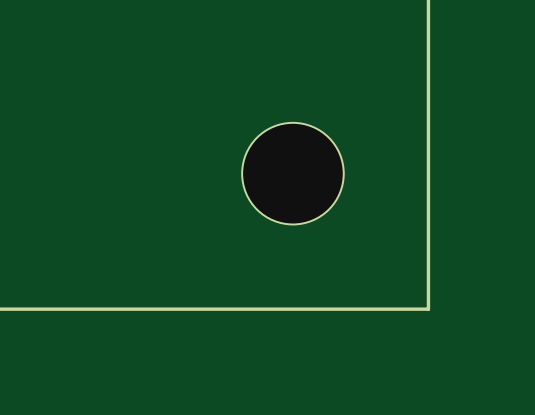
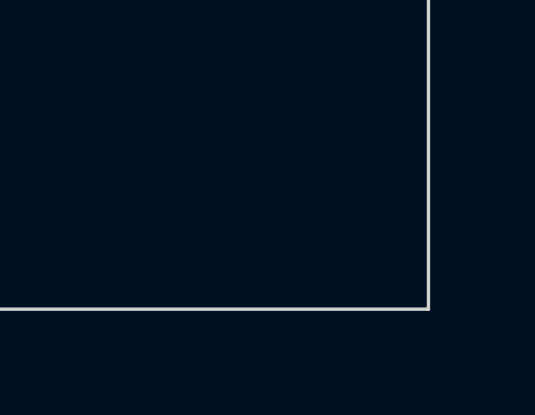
part: (292, 173) -> none

